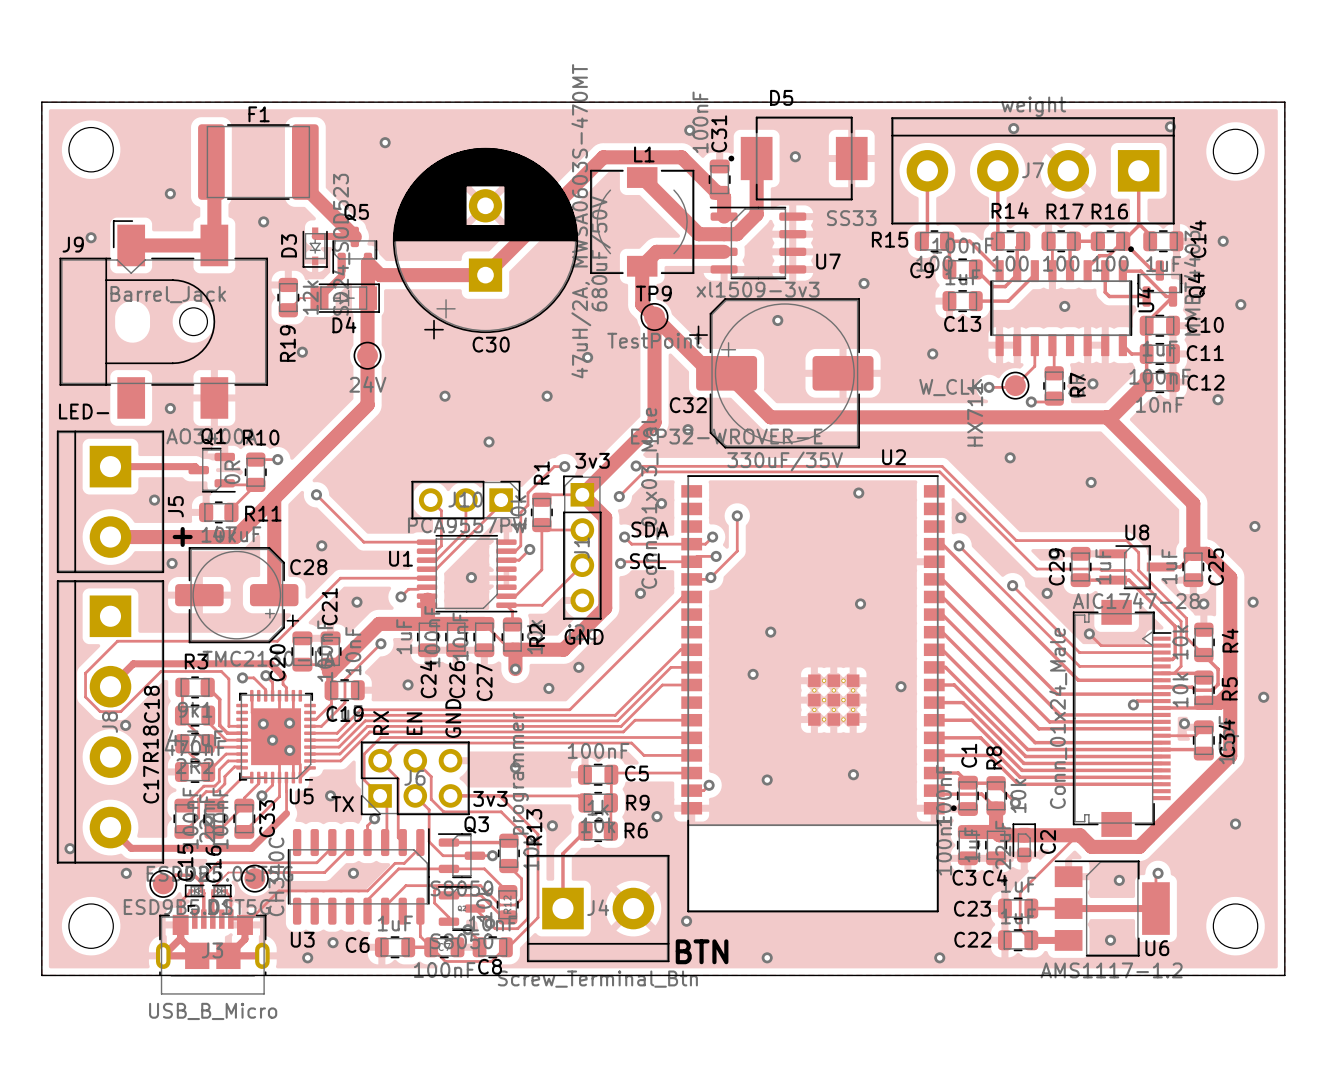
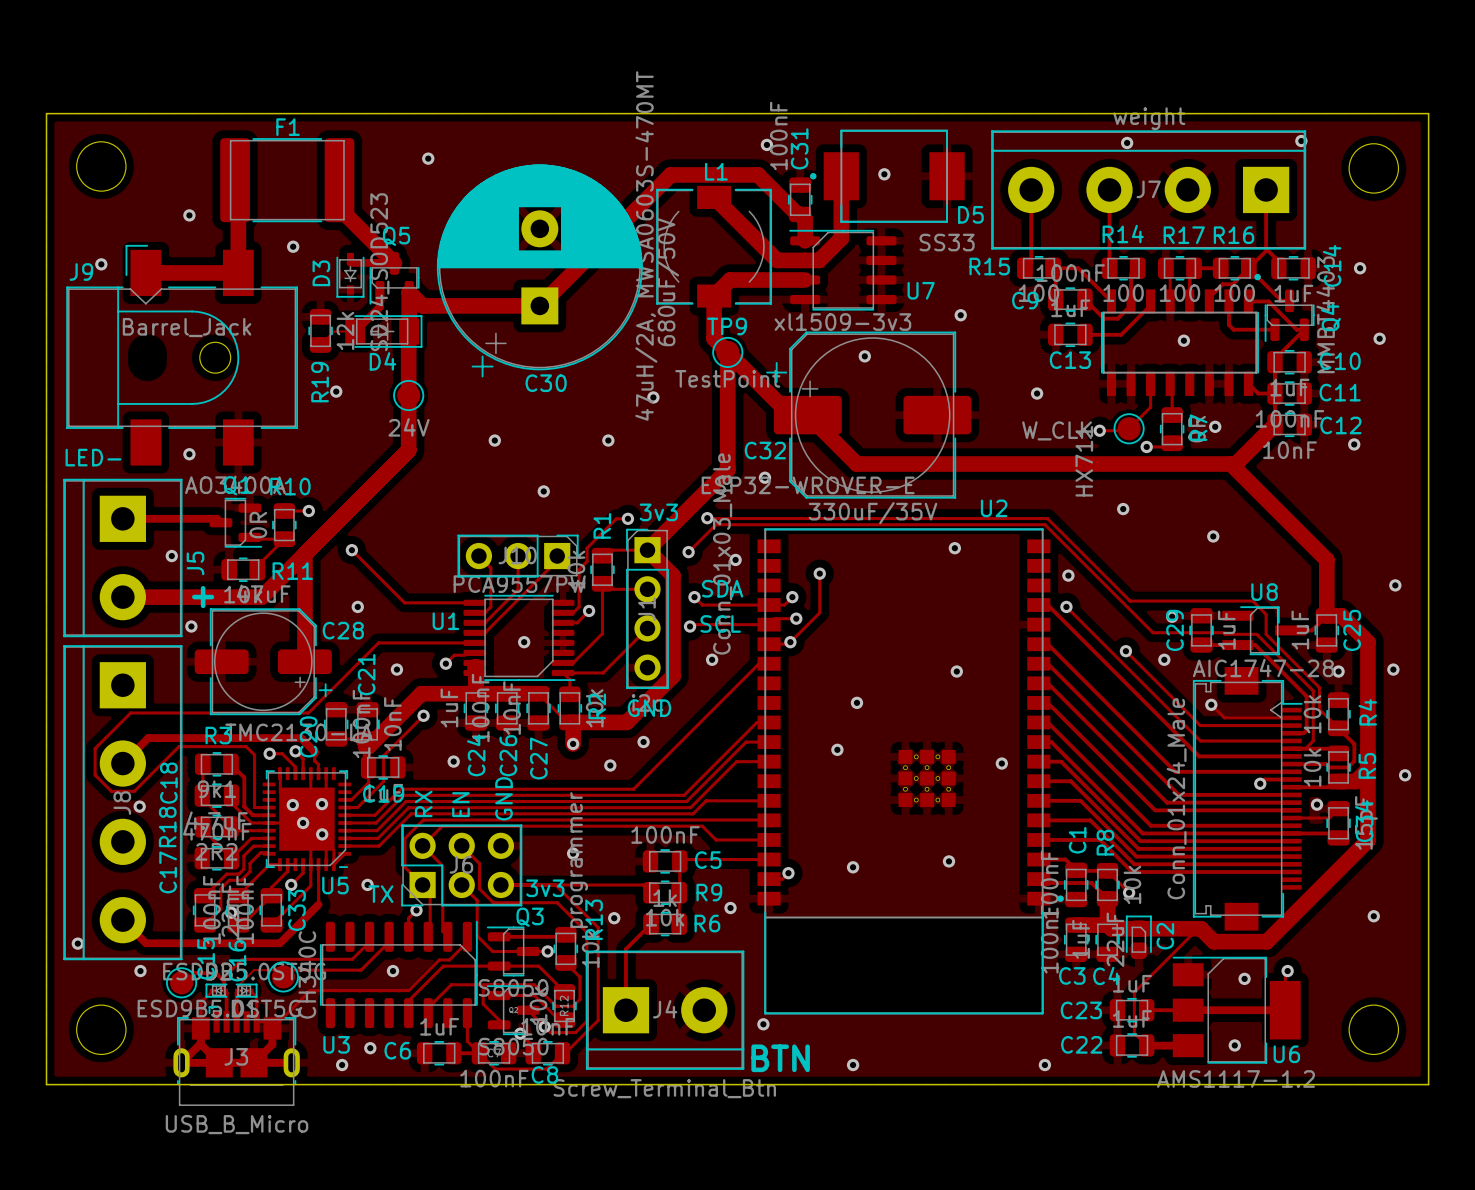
D5 name position: D5 (781, 97) -> D5 (970, 214)
U4 name: U4 (1145, 300) -> none

